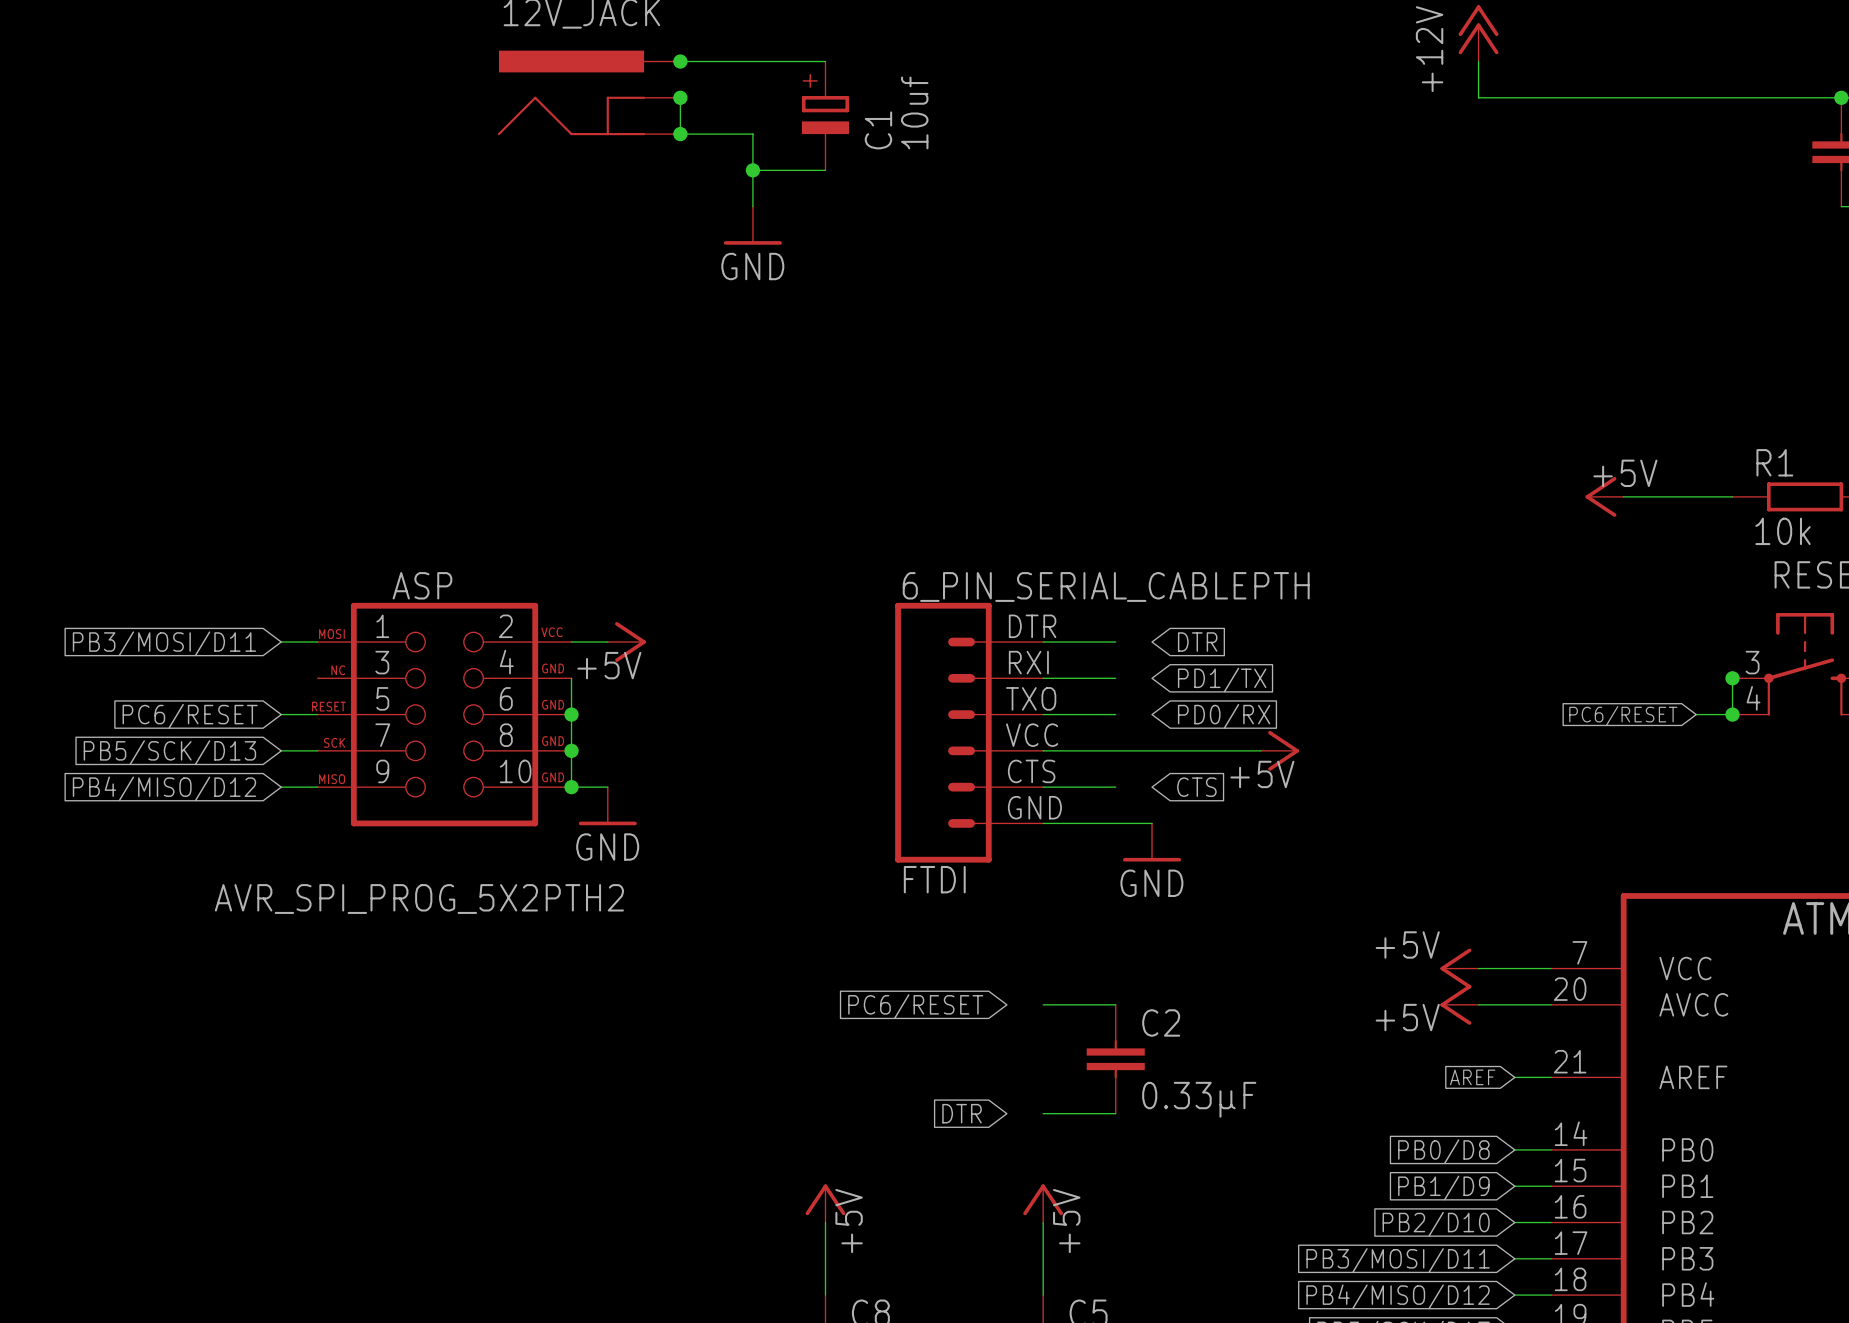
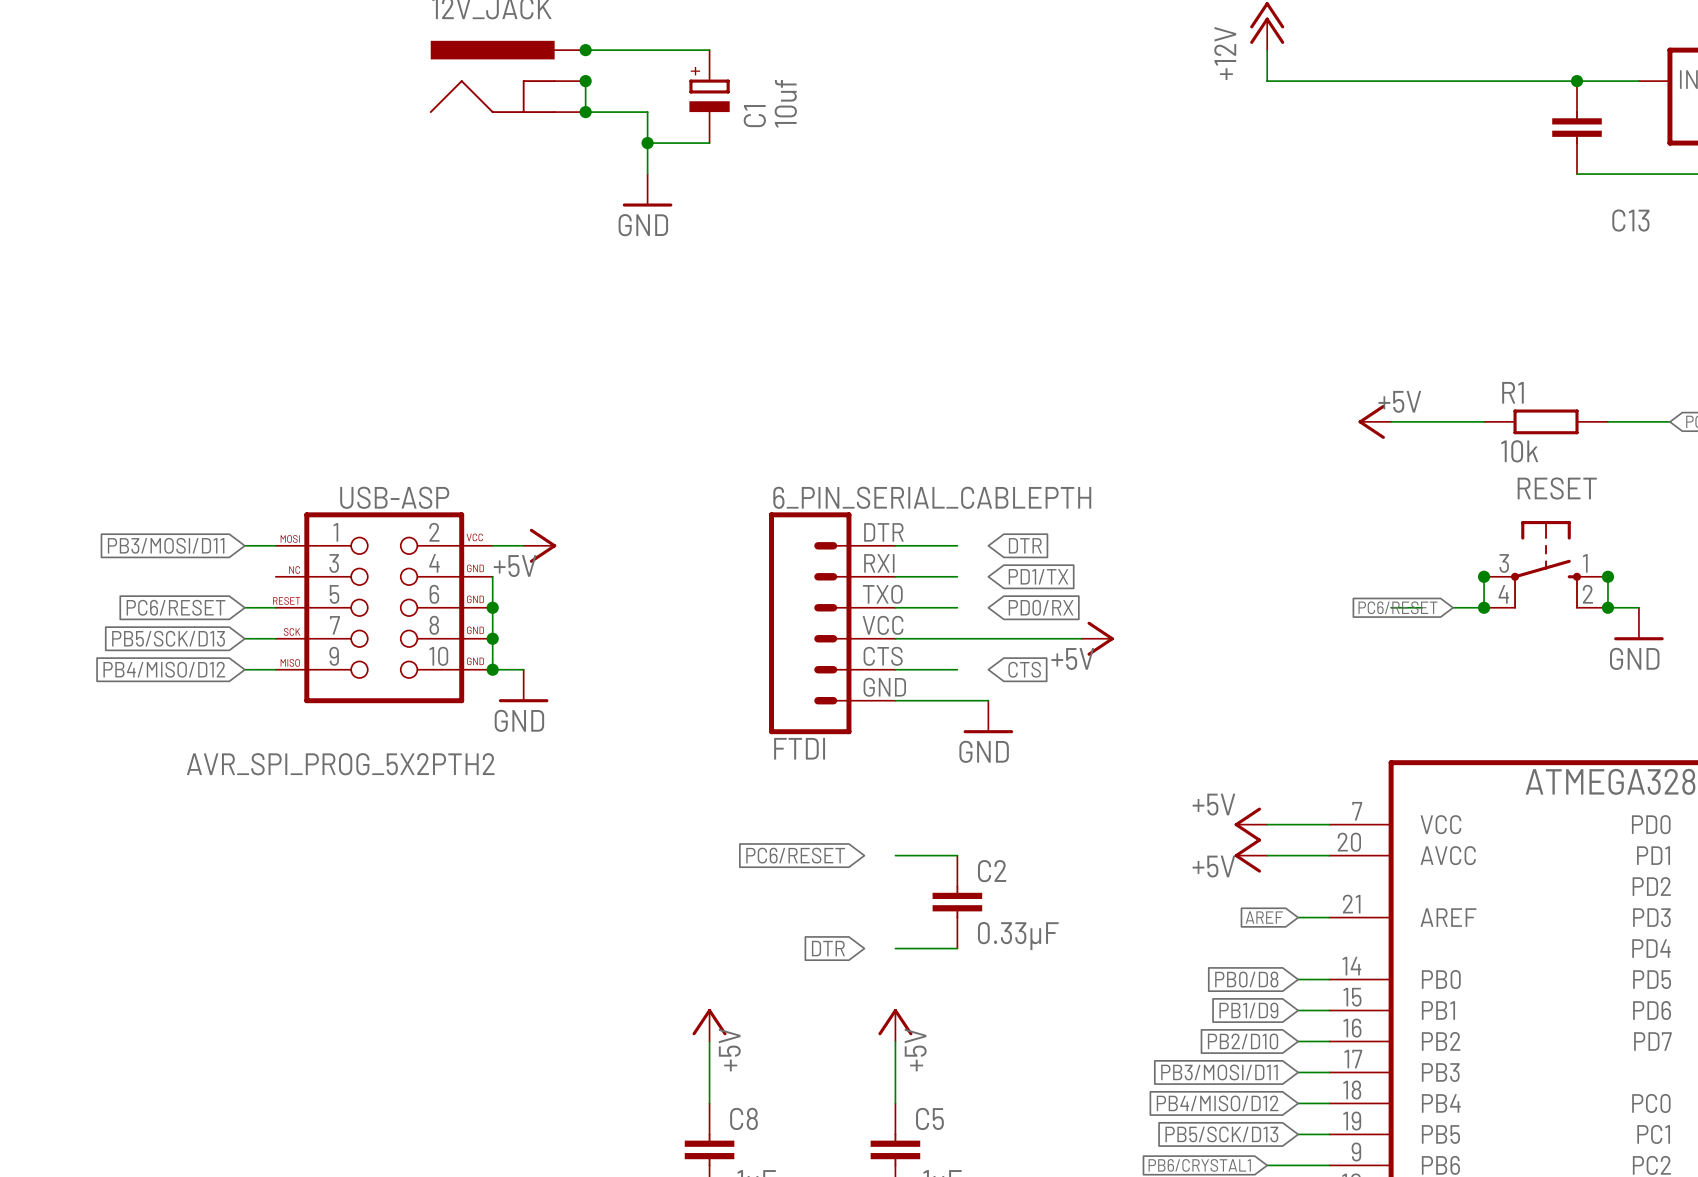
ASP name: ASP (422, 585) -> USB-ASP (394, 497)
wire: none -> (1391, 607) (1422, 607)

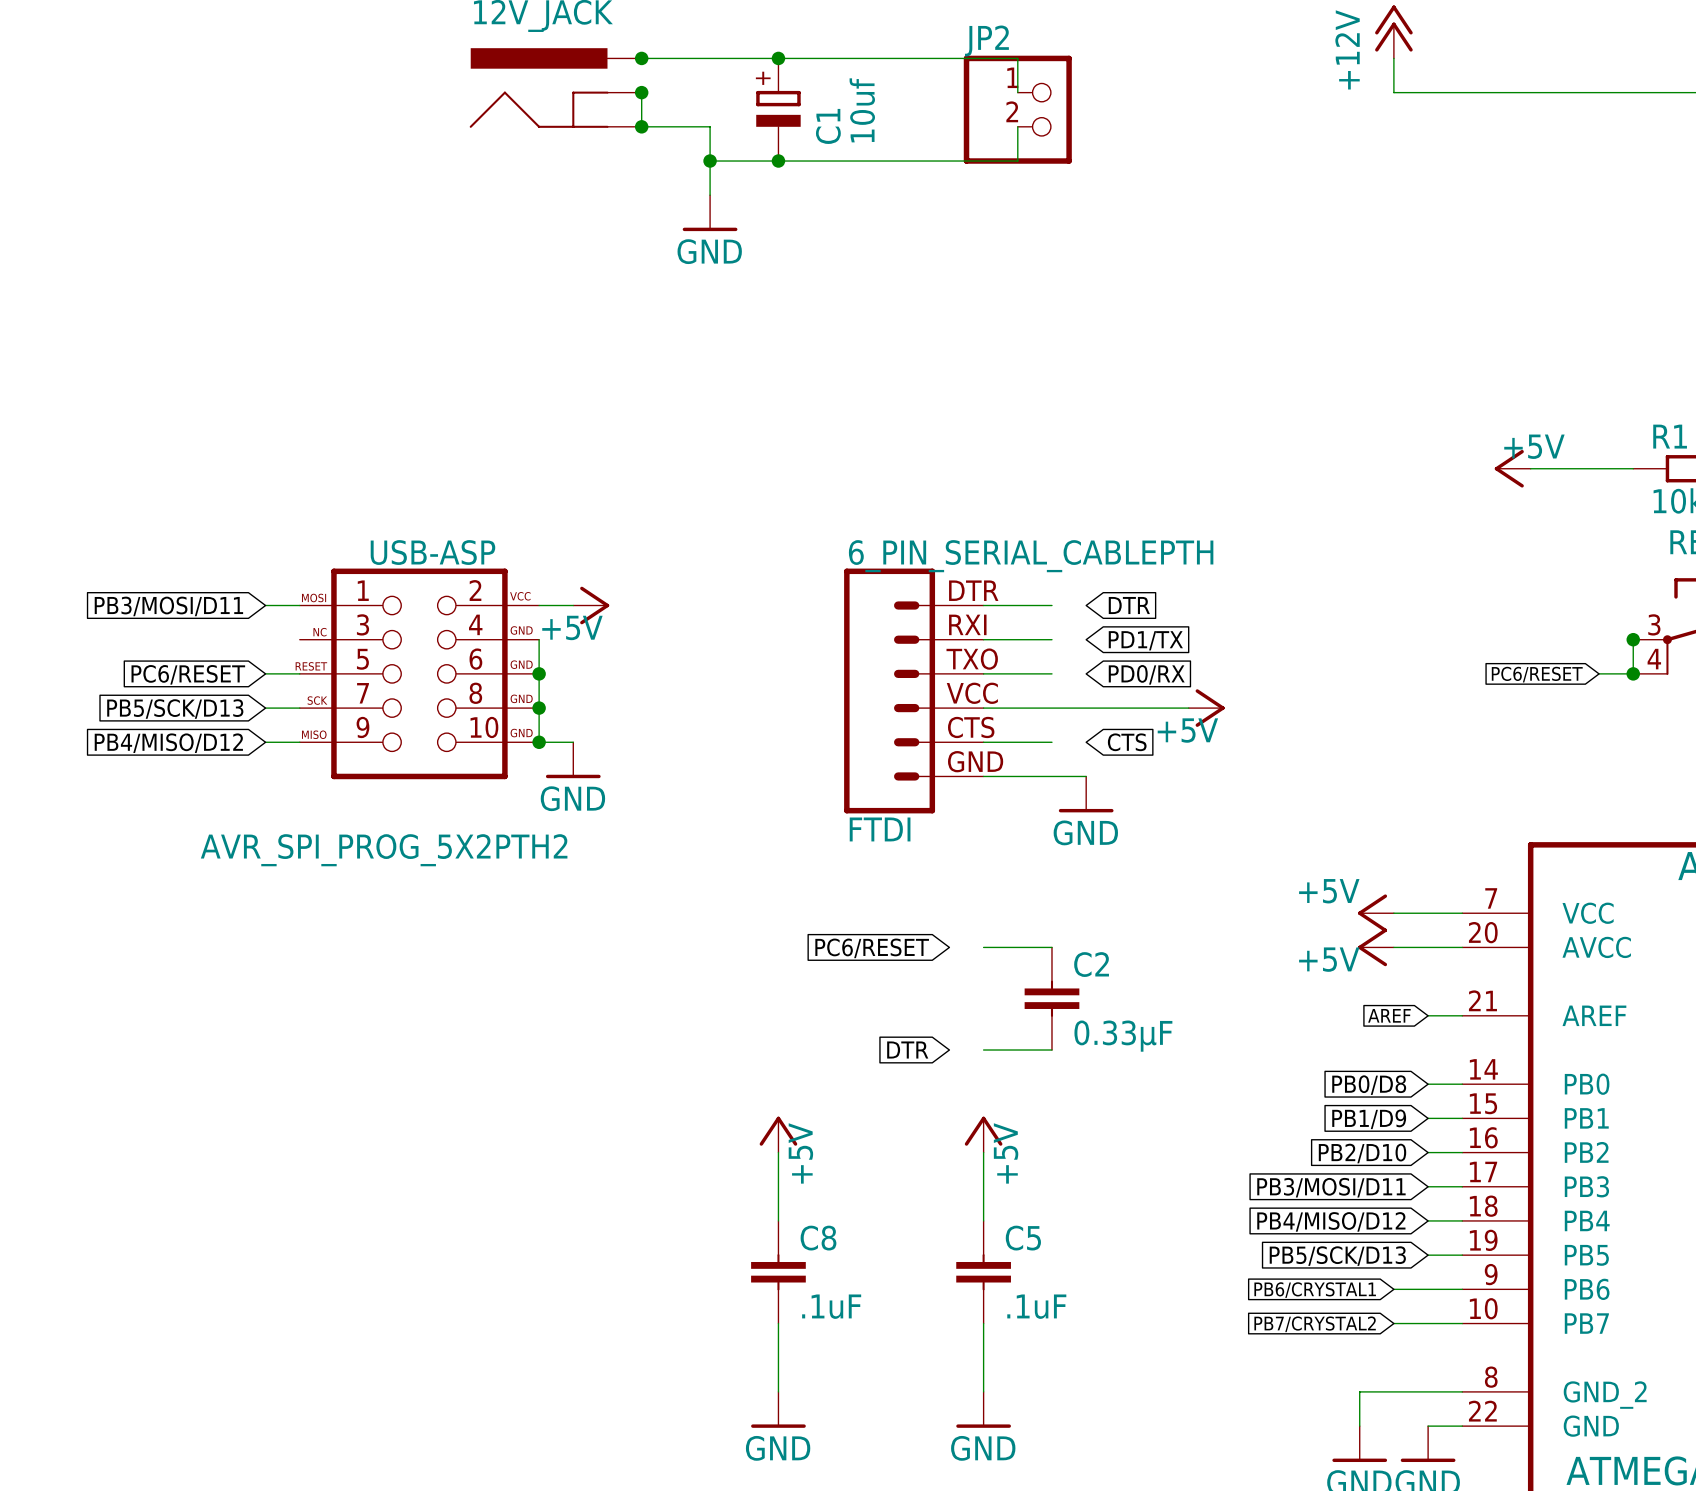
wire: none -> (778, 58) (1017, 58) (1017, 92)
junction: none -> (778, 58)
JP2: none -> (1017, 109)
wire: none -> (1017, 126) (1017, 161) (778, 161)
junction: none -> (778, 161)
wire: (1391, 607) (1422, 607) -> none

